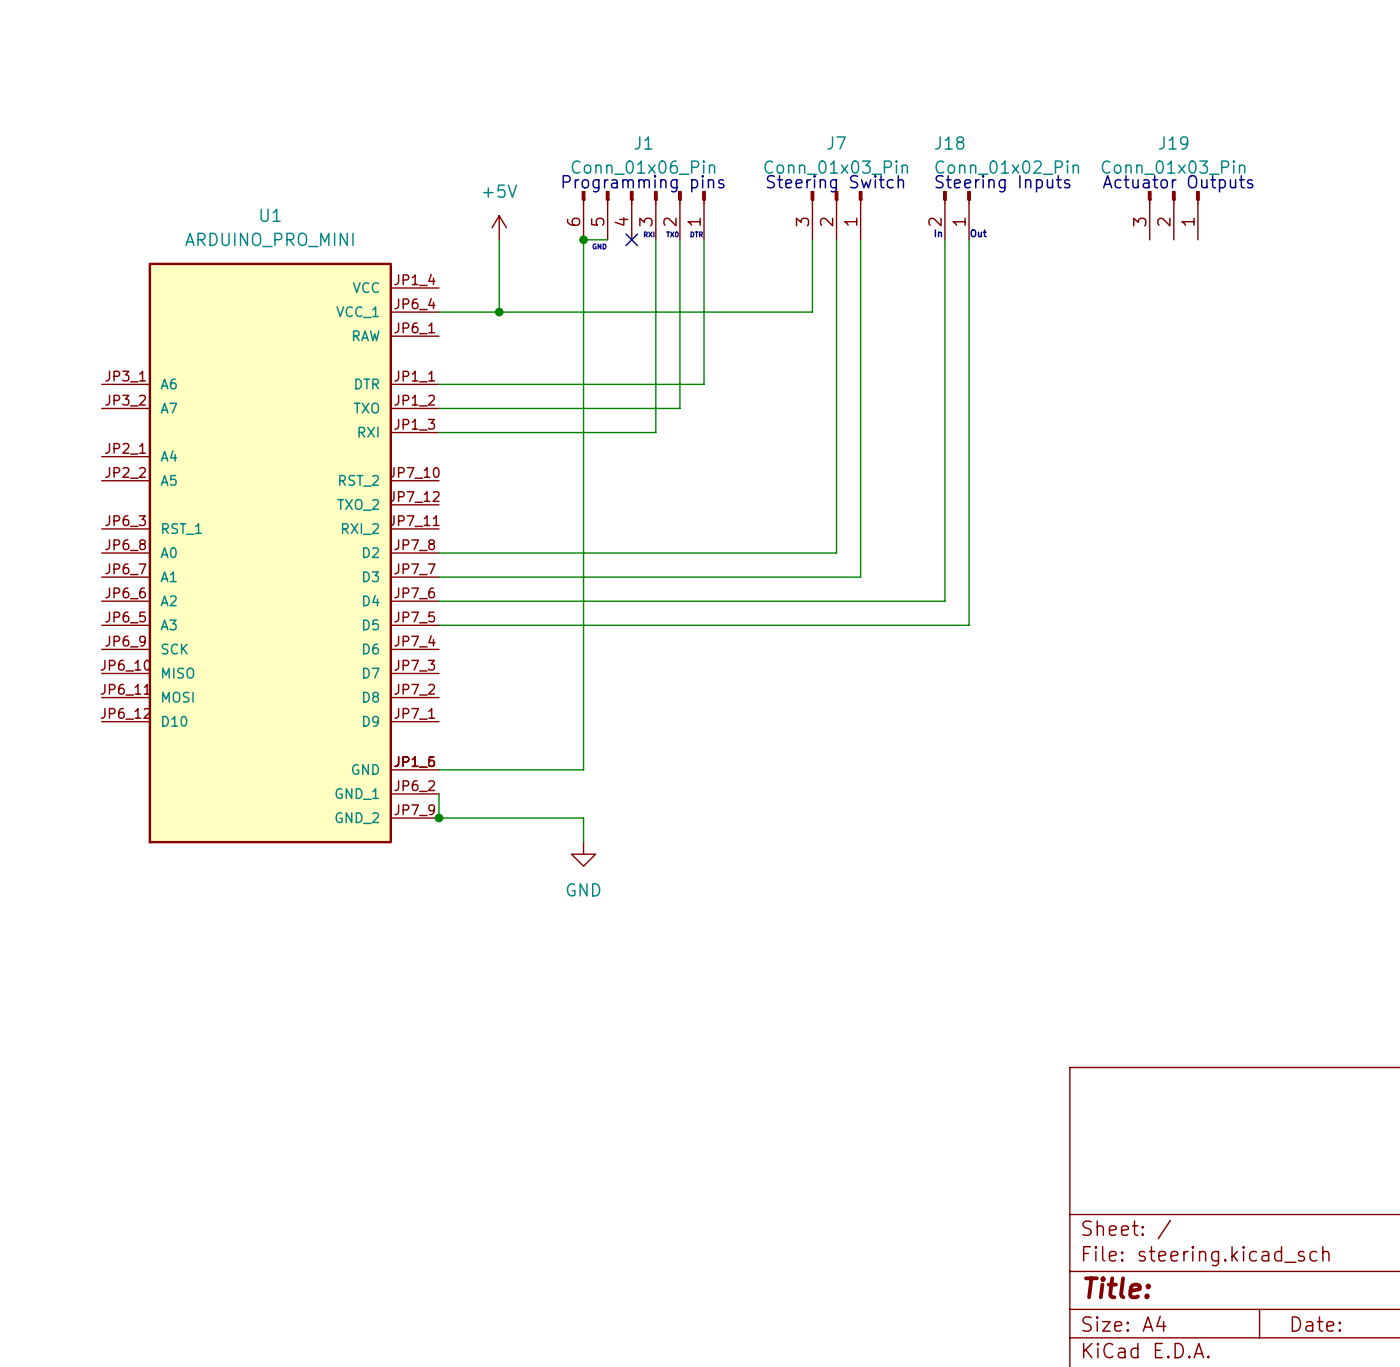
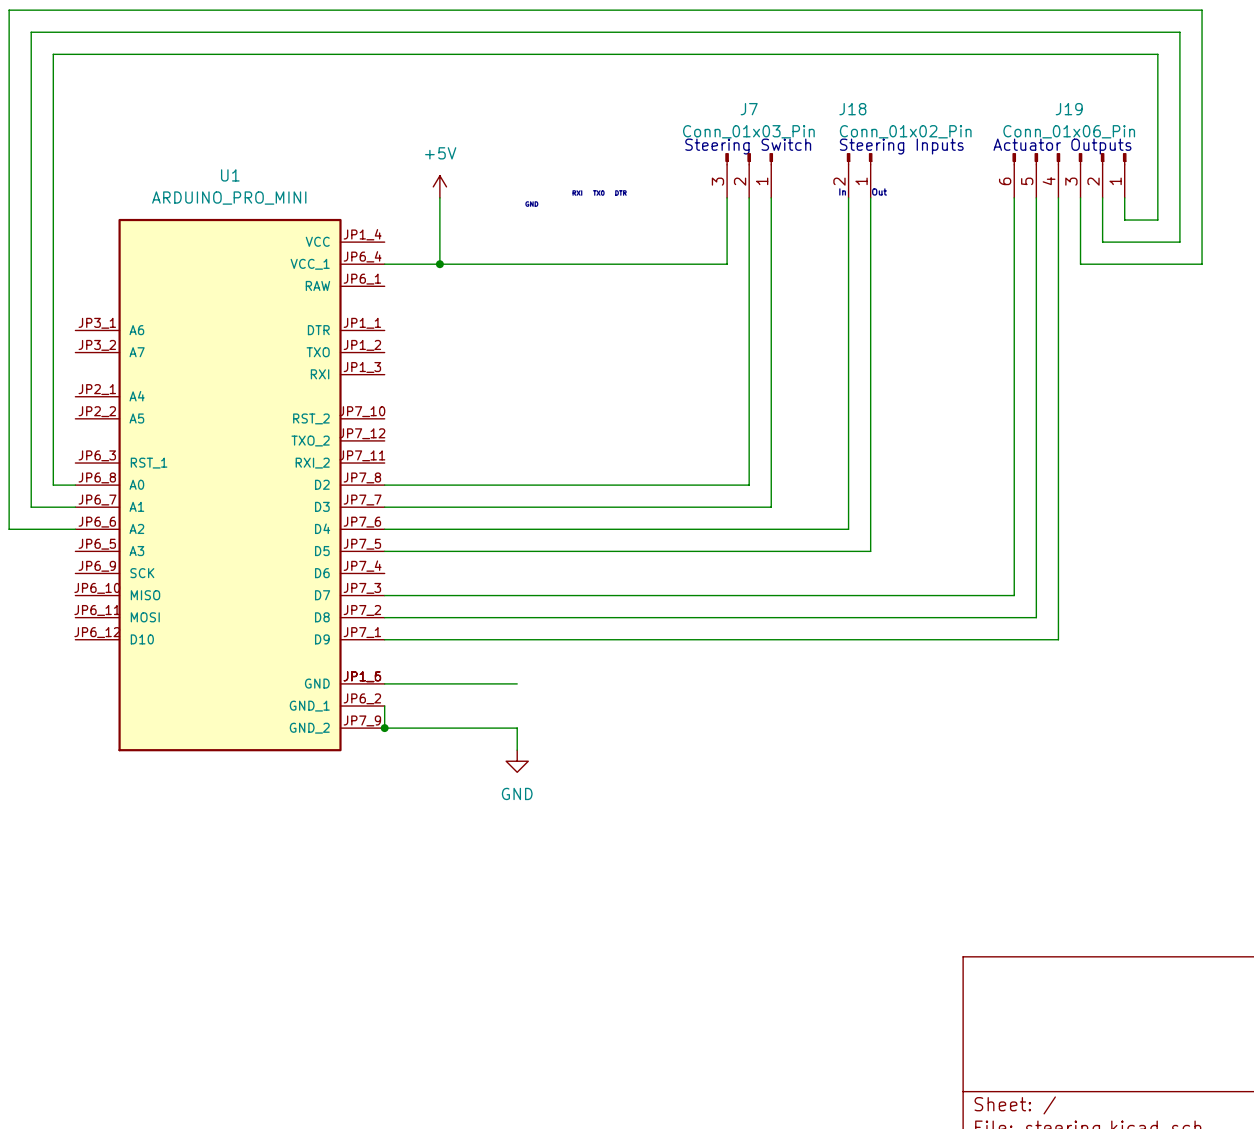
J19 value: Conn_01x03_Pin (1173, 167) -> Conn_01x06_Pin (1069, 131)
text: Programming pins (643, 183) -> none
J19 symbol: [1147, 190, 1200, 240] -> [1012, 153, 1127, 198]
J1: Conn_01x06_Pin (643, 215) -> none
junction: (583, 239) -> none
wire: (607, 239) (583, 239) (583, 769) -> none
no-connect mark: (631, 239) -> none
wire: (655, 239) (655, 432) (438, 432) -> none
wire: (679, 239) (679, 408) (438, 408) -> none
wire: (704, 239) (704, 384) (438, 384) -> none
wire: none -> (1014, 197) (1014, 595) (384, 595)
wire: none -> (1036, 197) (1036, 617) (384, 617)
wire: none -> (1058, 197) (1058, 639) (384, 639)
wire: none -> (1080, 197) (1080, 264) (1202, 264) (1202, 10) (9, 10) (9, 529) (75, 529)
wire: none -> (1102, 197) (1102, 242) (1179, 242) (1179, 32) (31, 32) (31, 507) (75, 507)
wire: none -> (1124, 197) (1124, 220) (1157, 220) (1157, 54) (53, 54) (53, 485) (75, 485)

